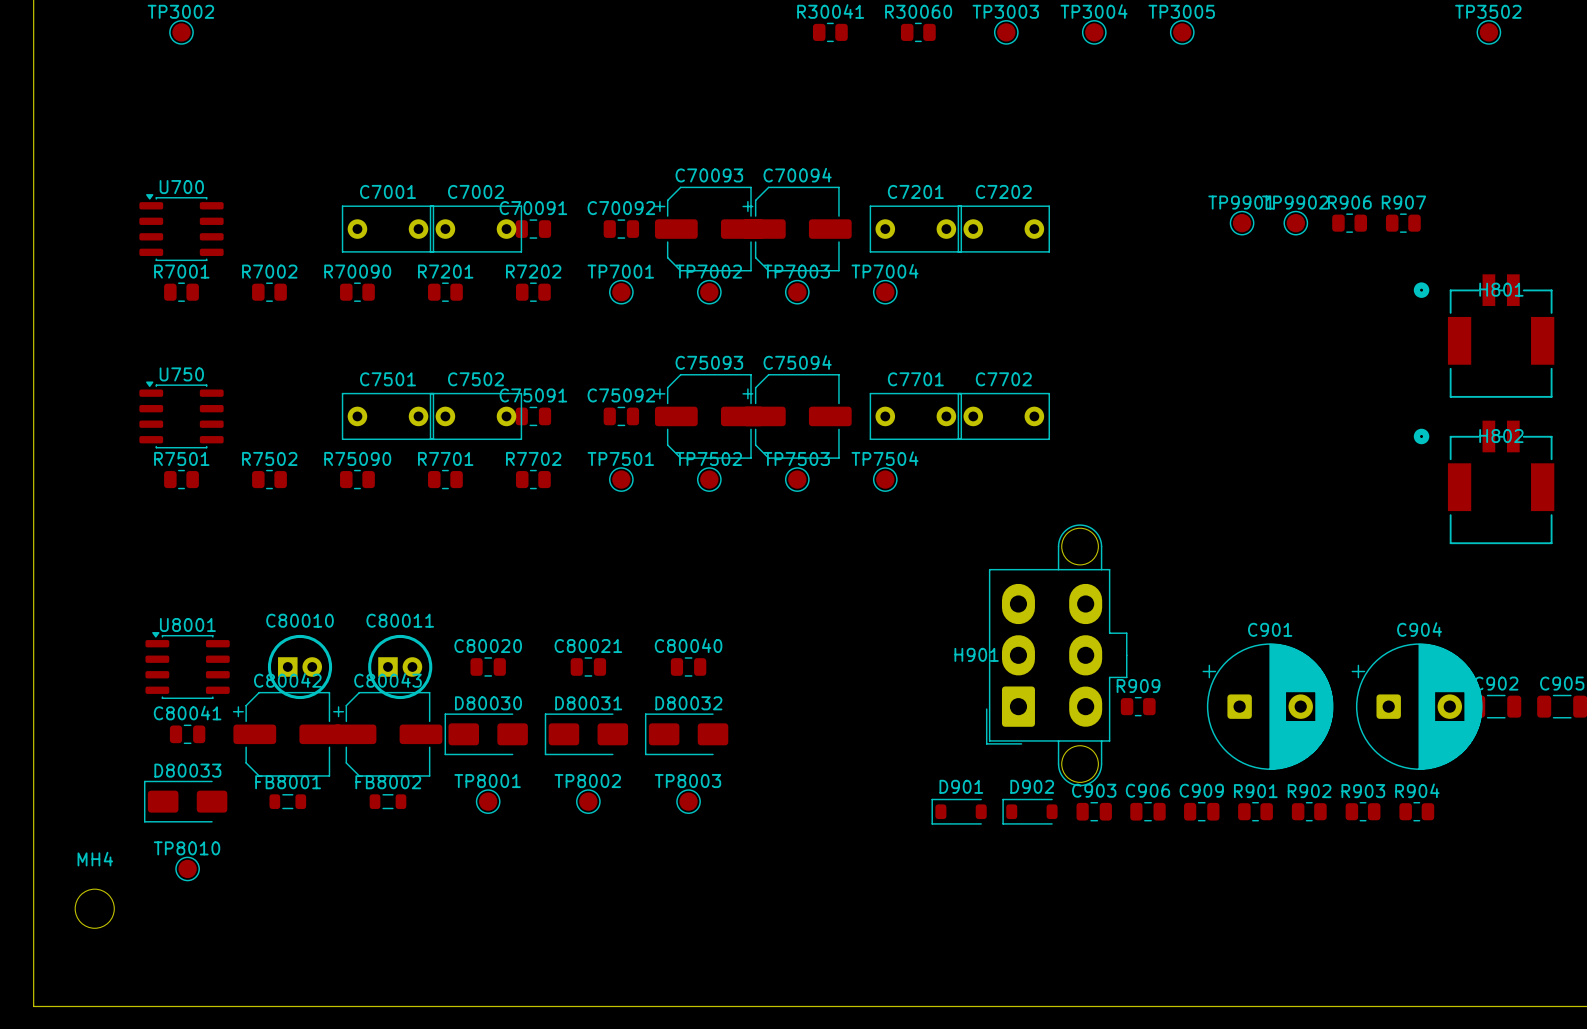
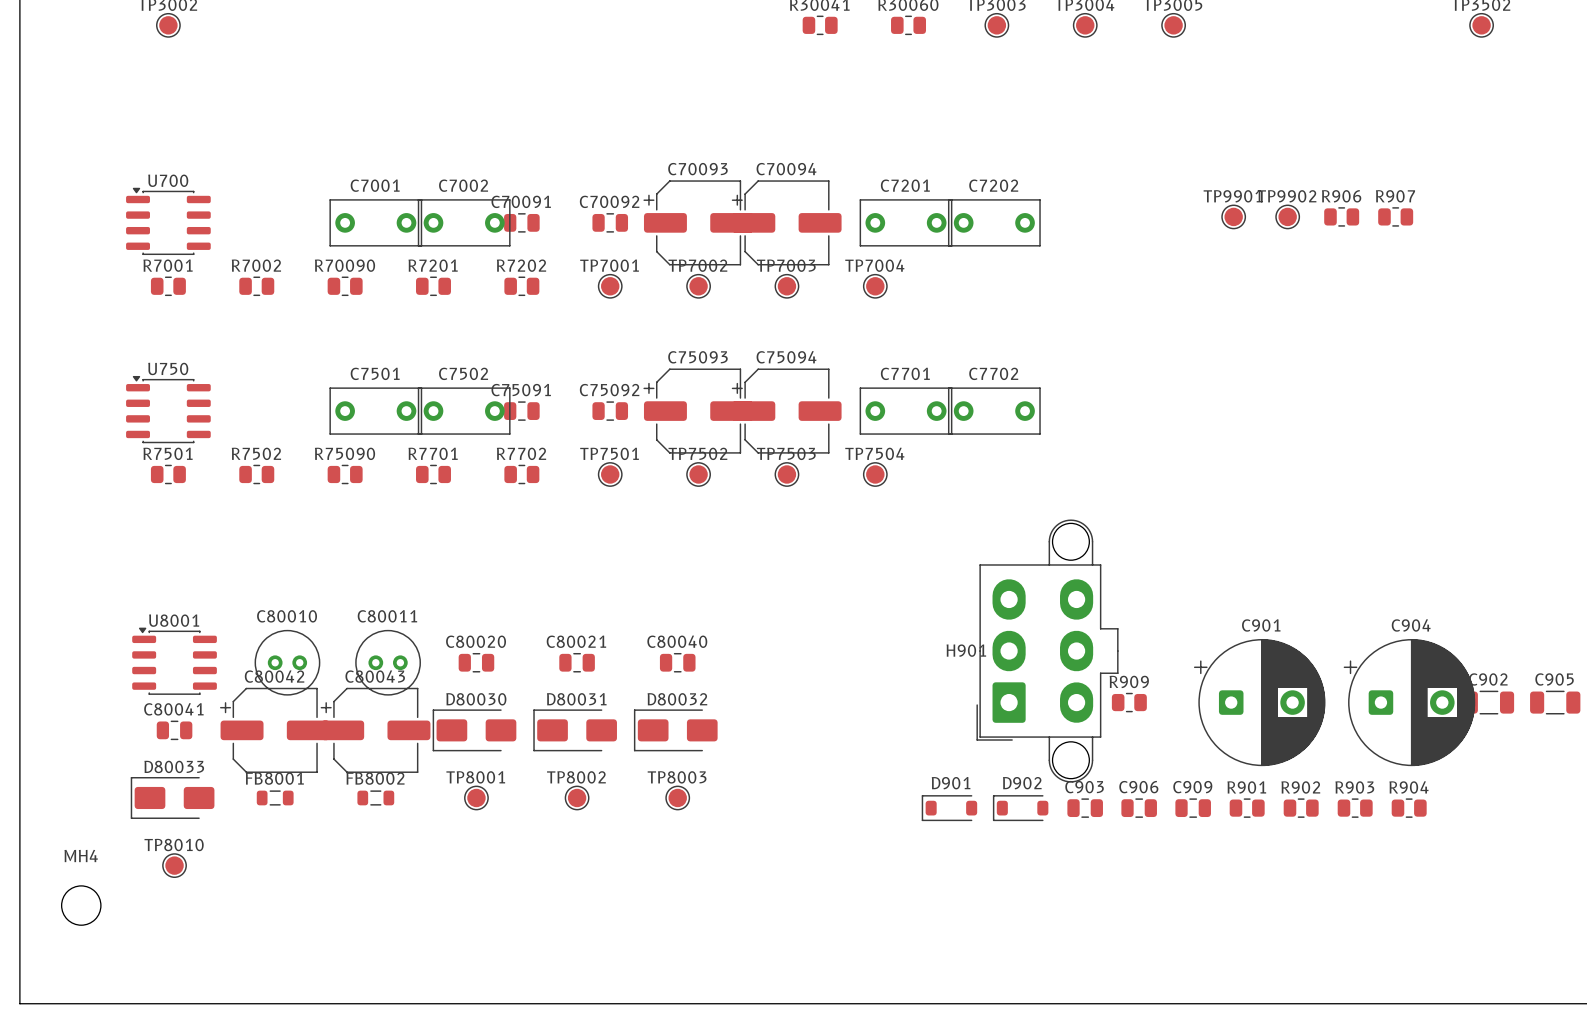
H801: (1484, 336) -> none
H802: (1484, 482) -> none
C80010 footprint: [267, 634, 333, 700] -> [254, 629, 321, 696]
C80011 footprint: [368, 634, 433, 700] -> [355, 629, 421, 696]

